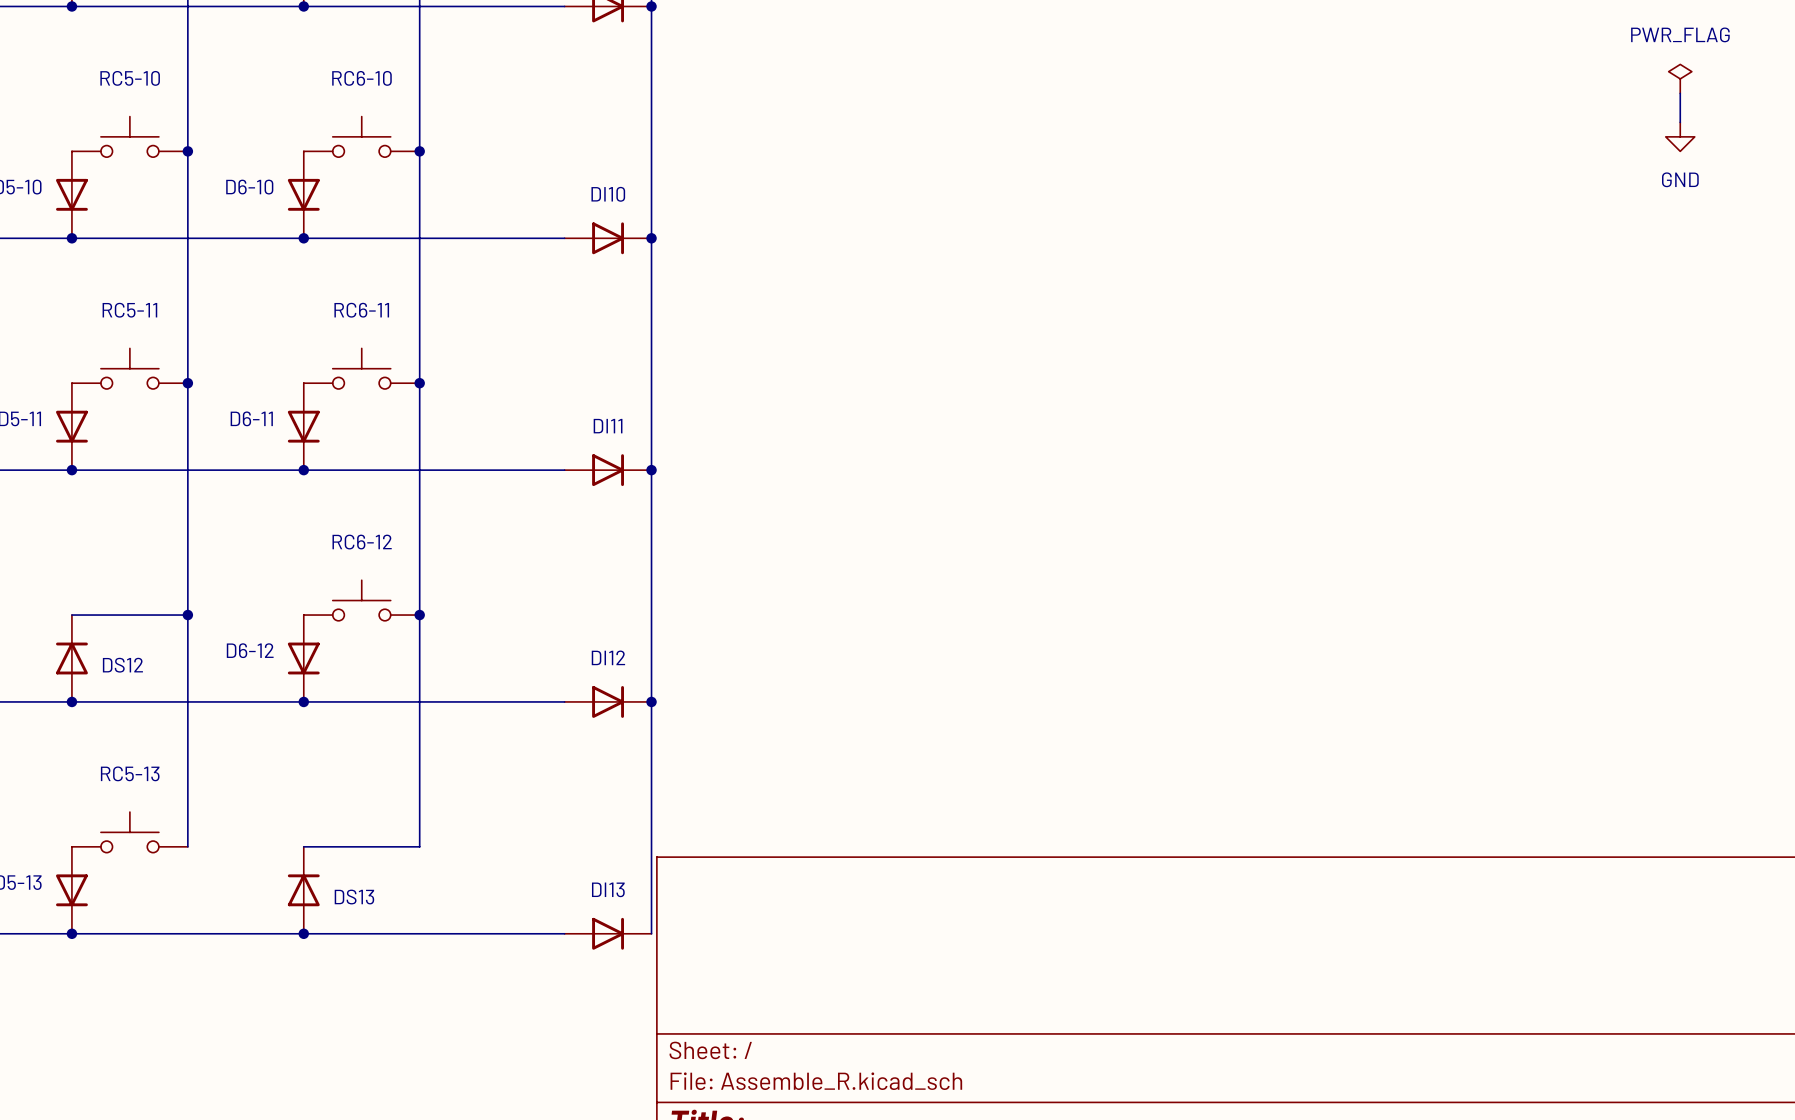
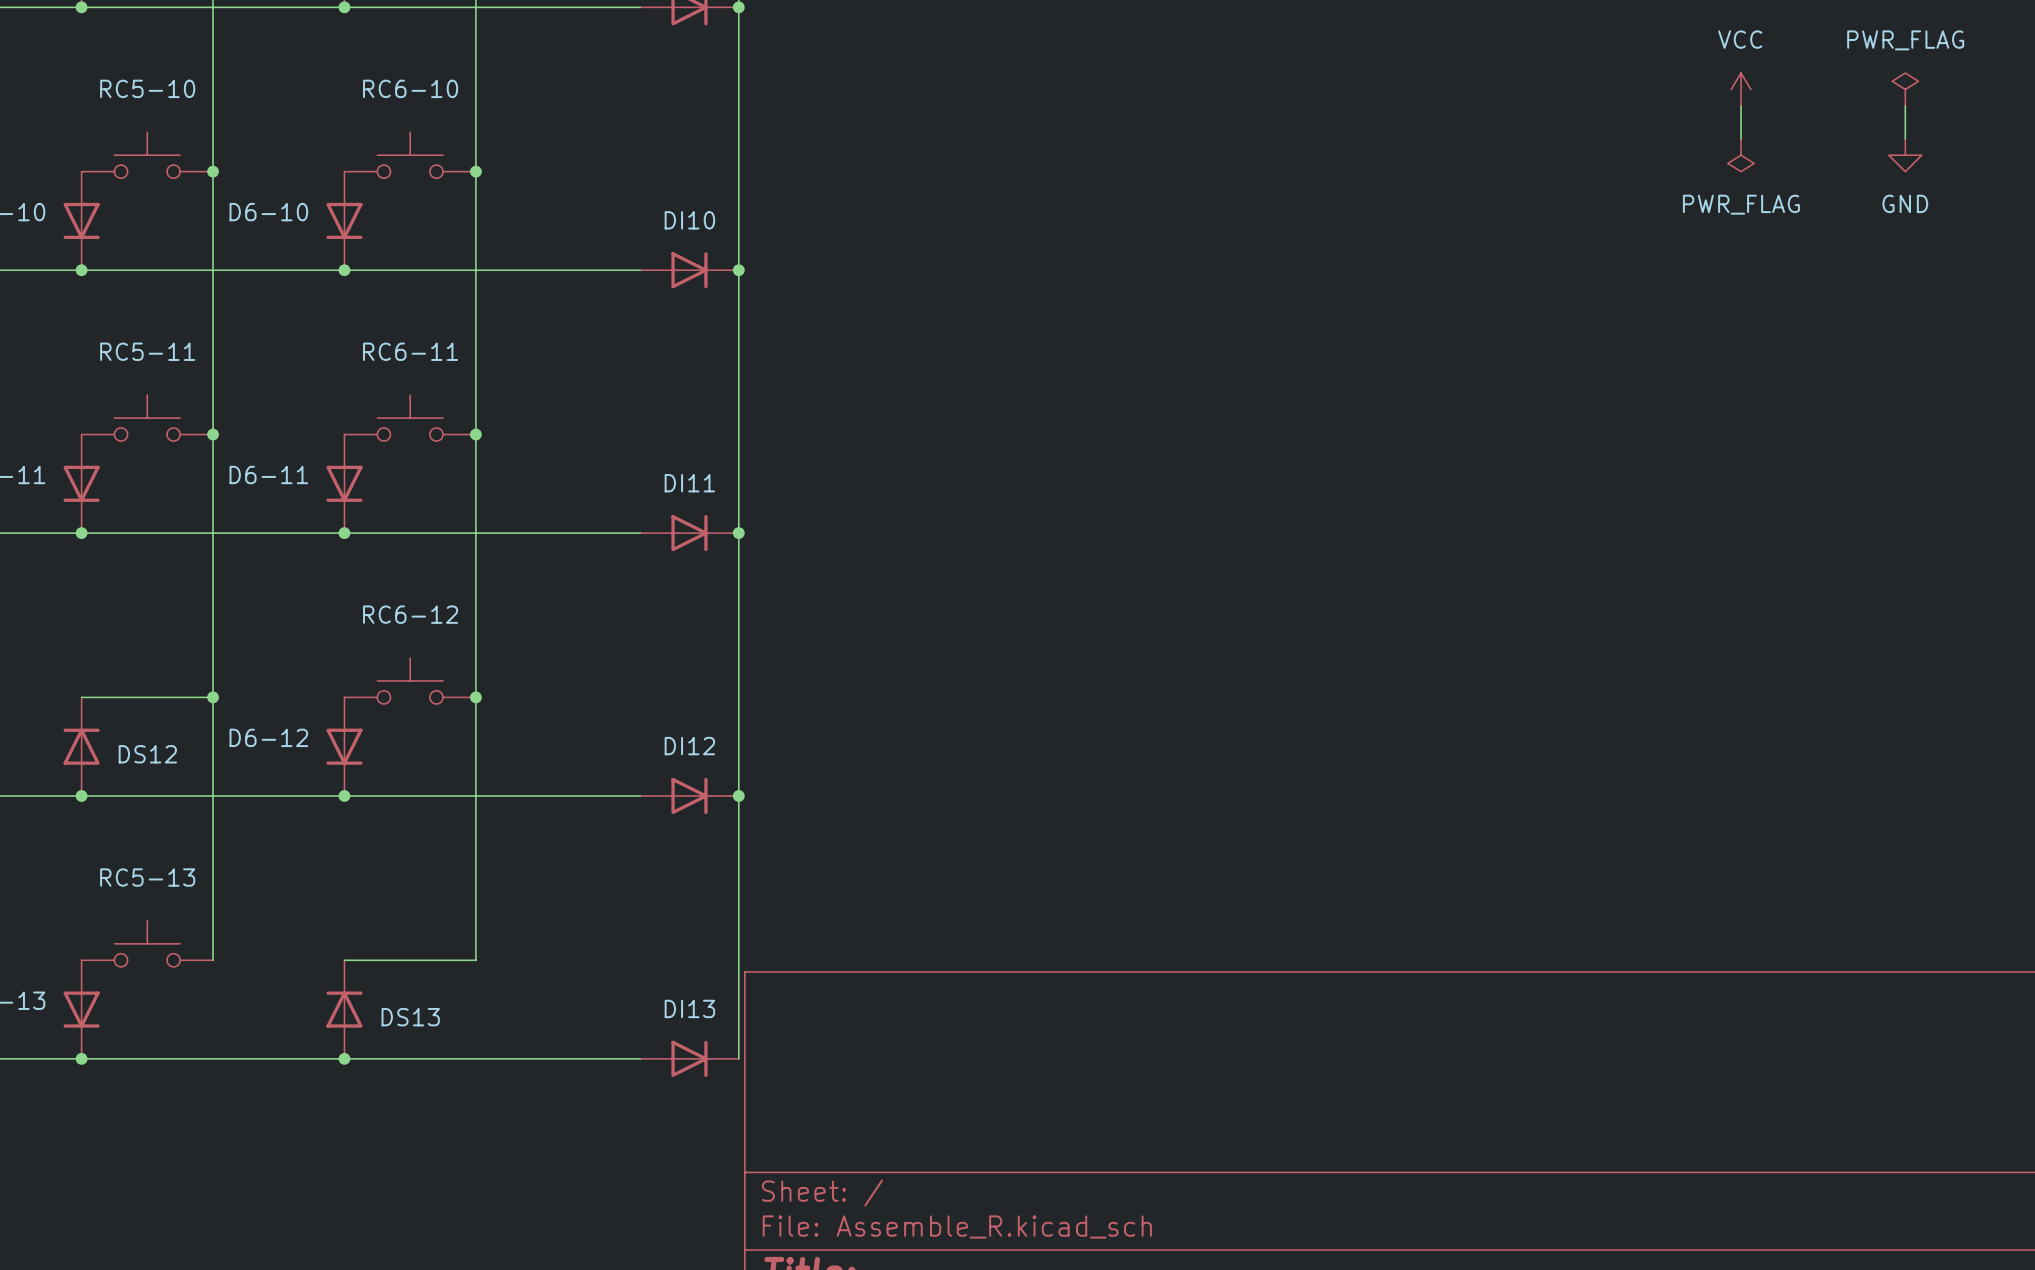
power symbol: none -> VCC (1741, 89)
wire: none -> (1741, 105) (1741, 138)
power symbol: none -> PWR_FLAG (1741, 155)

